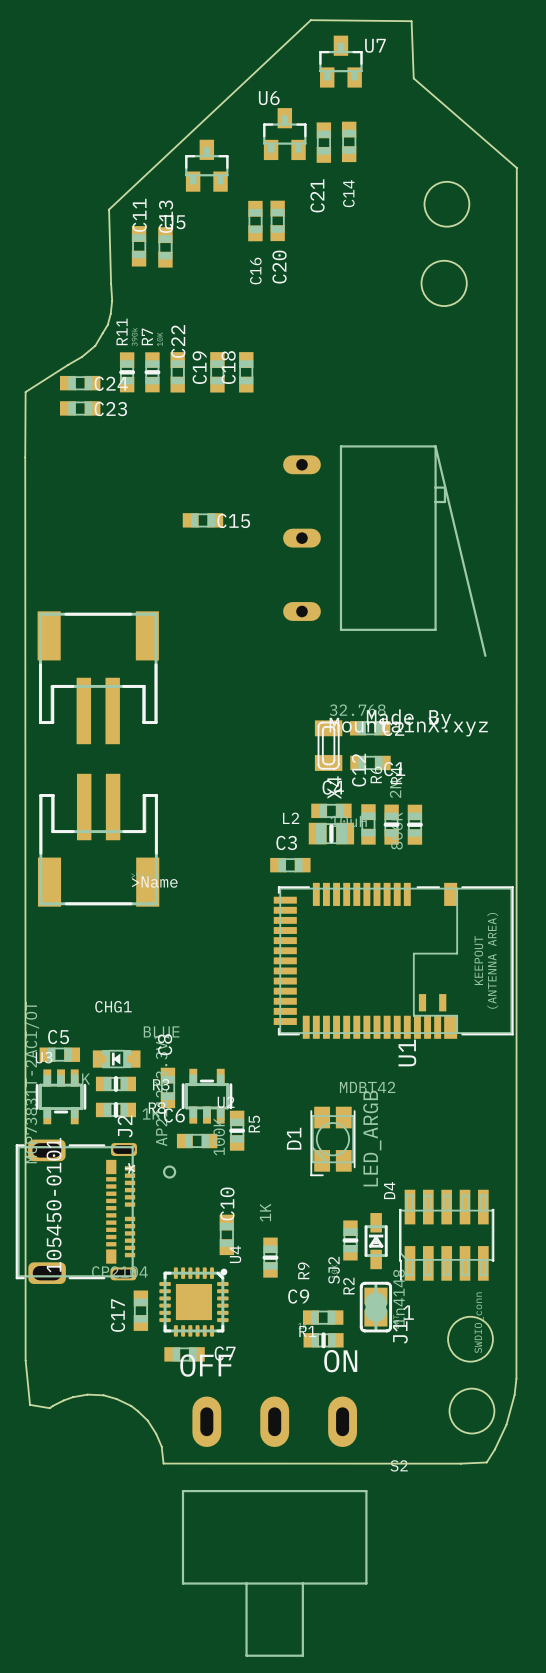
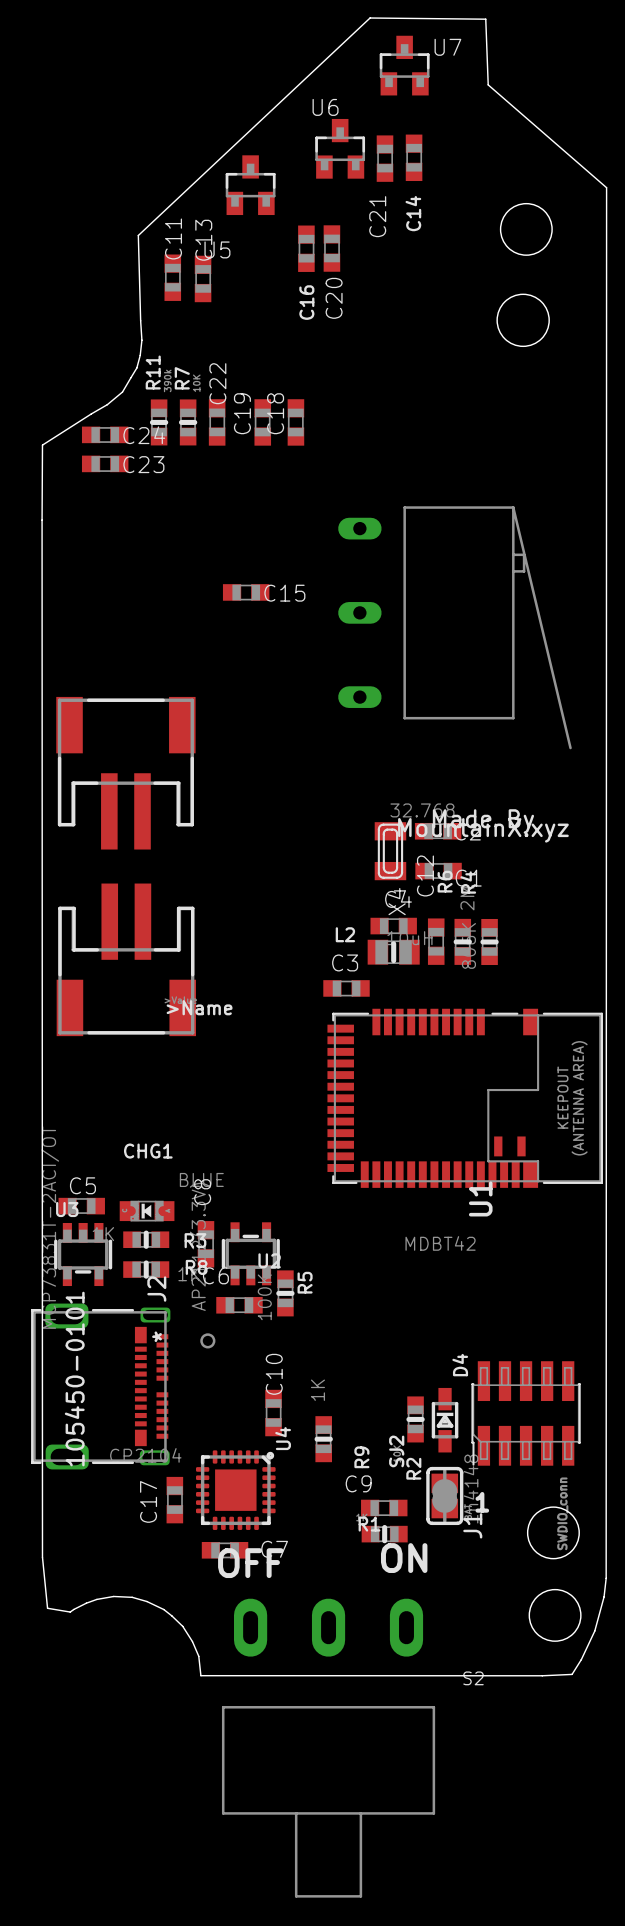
D1: LED_ARGB (332, 1141) -> none

